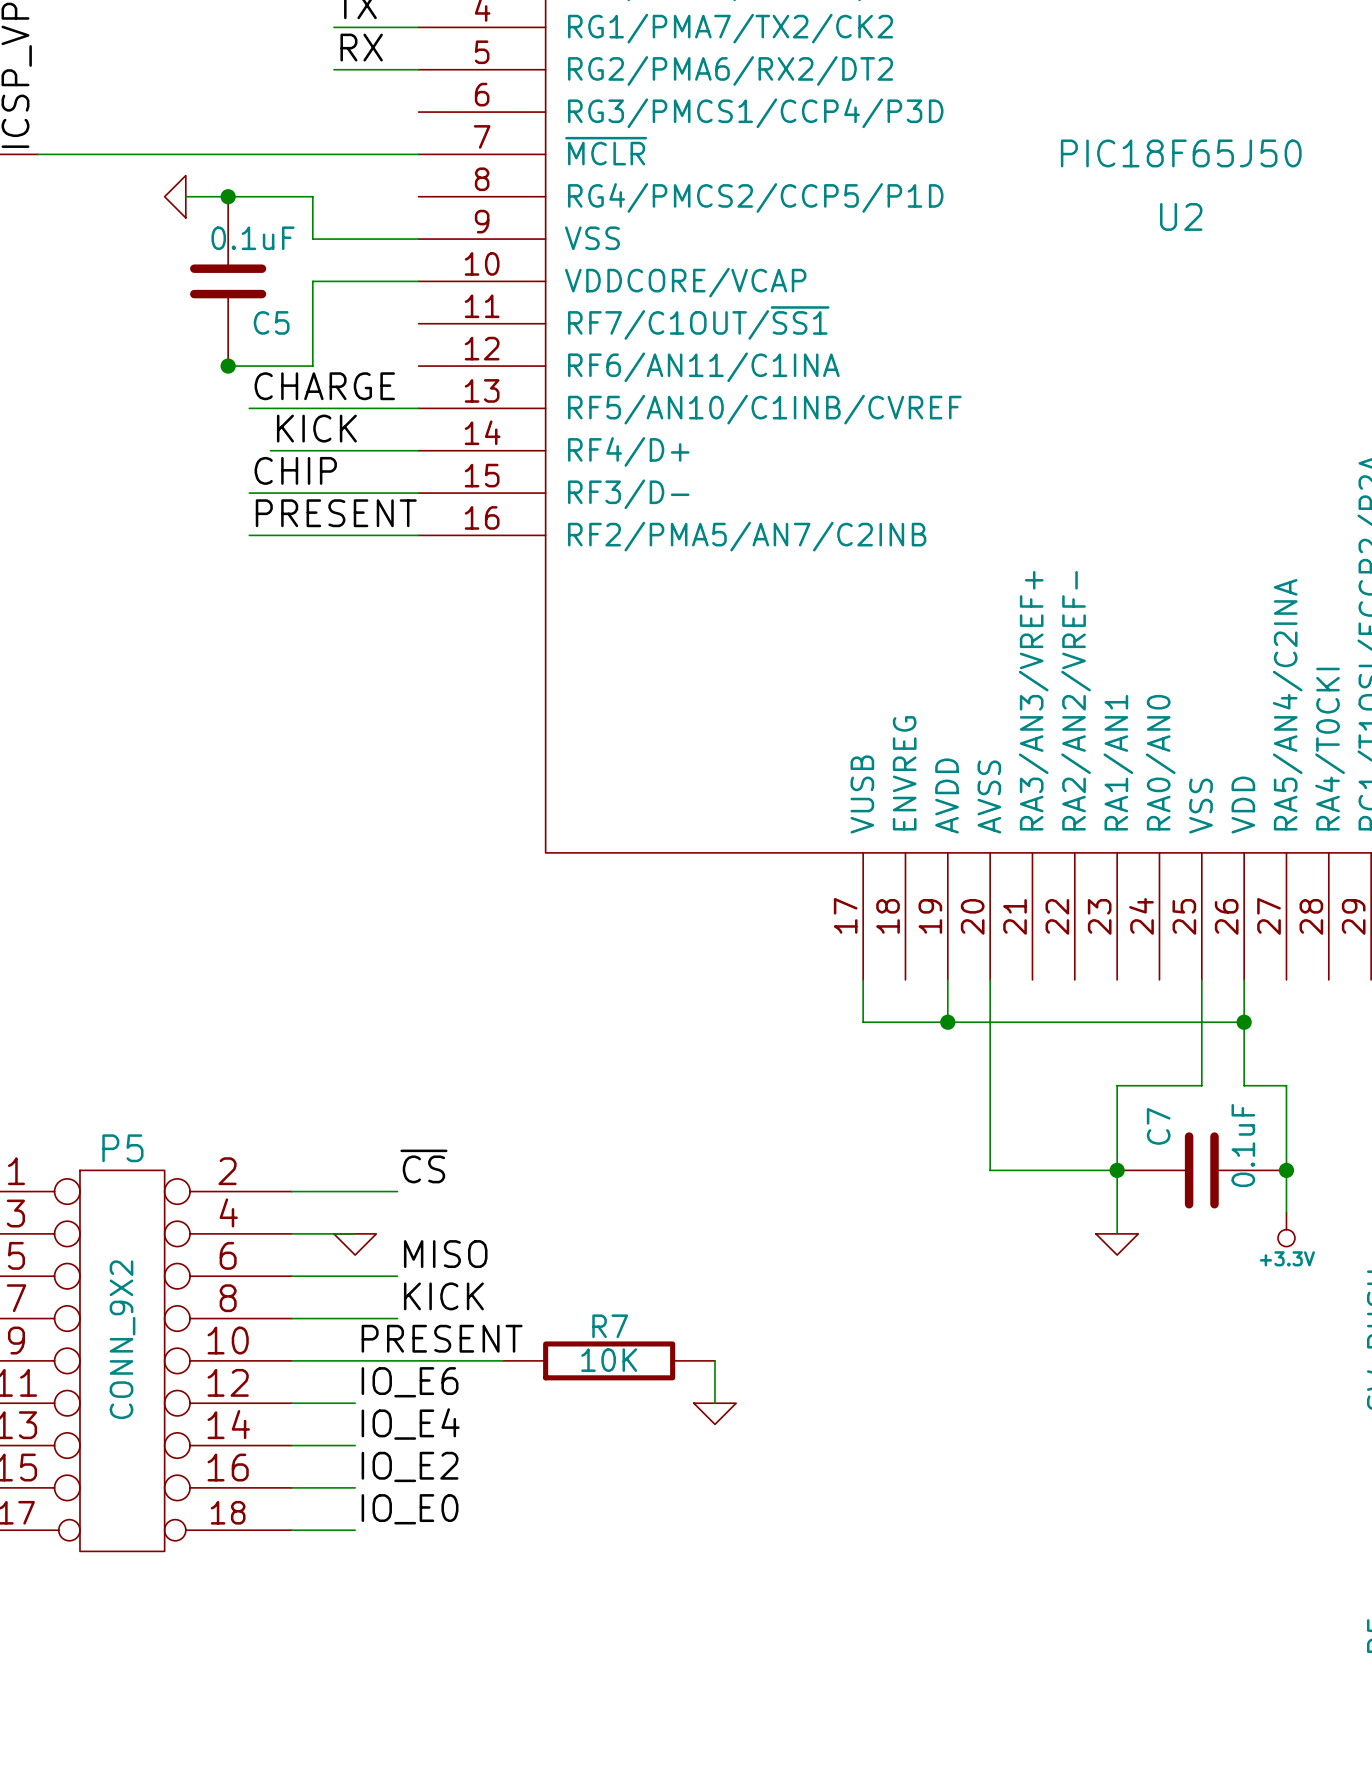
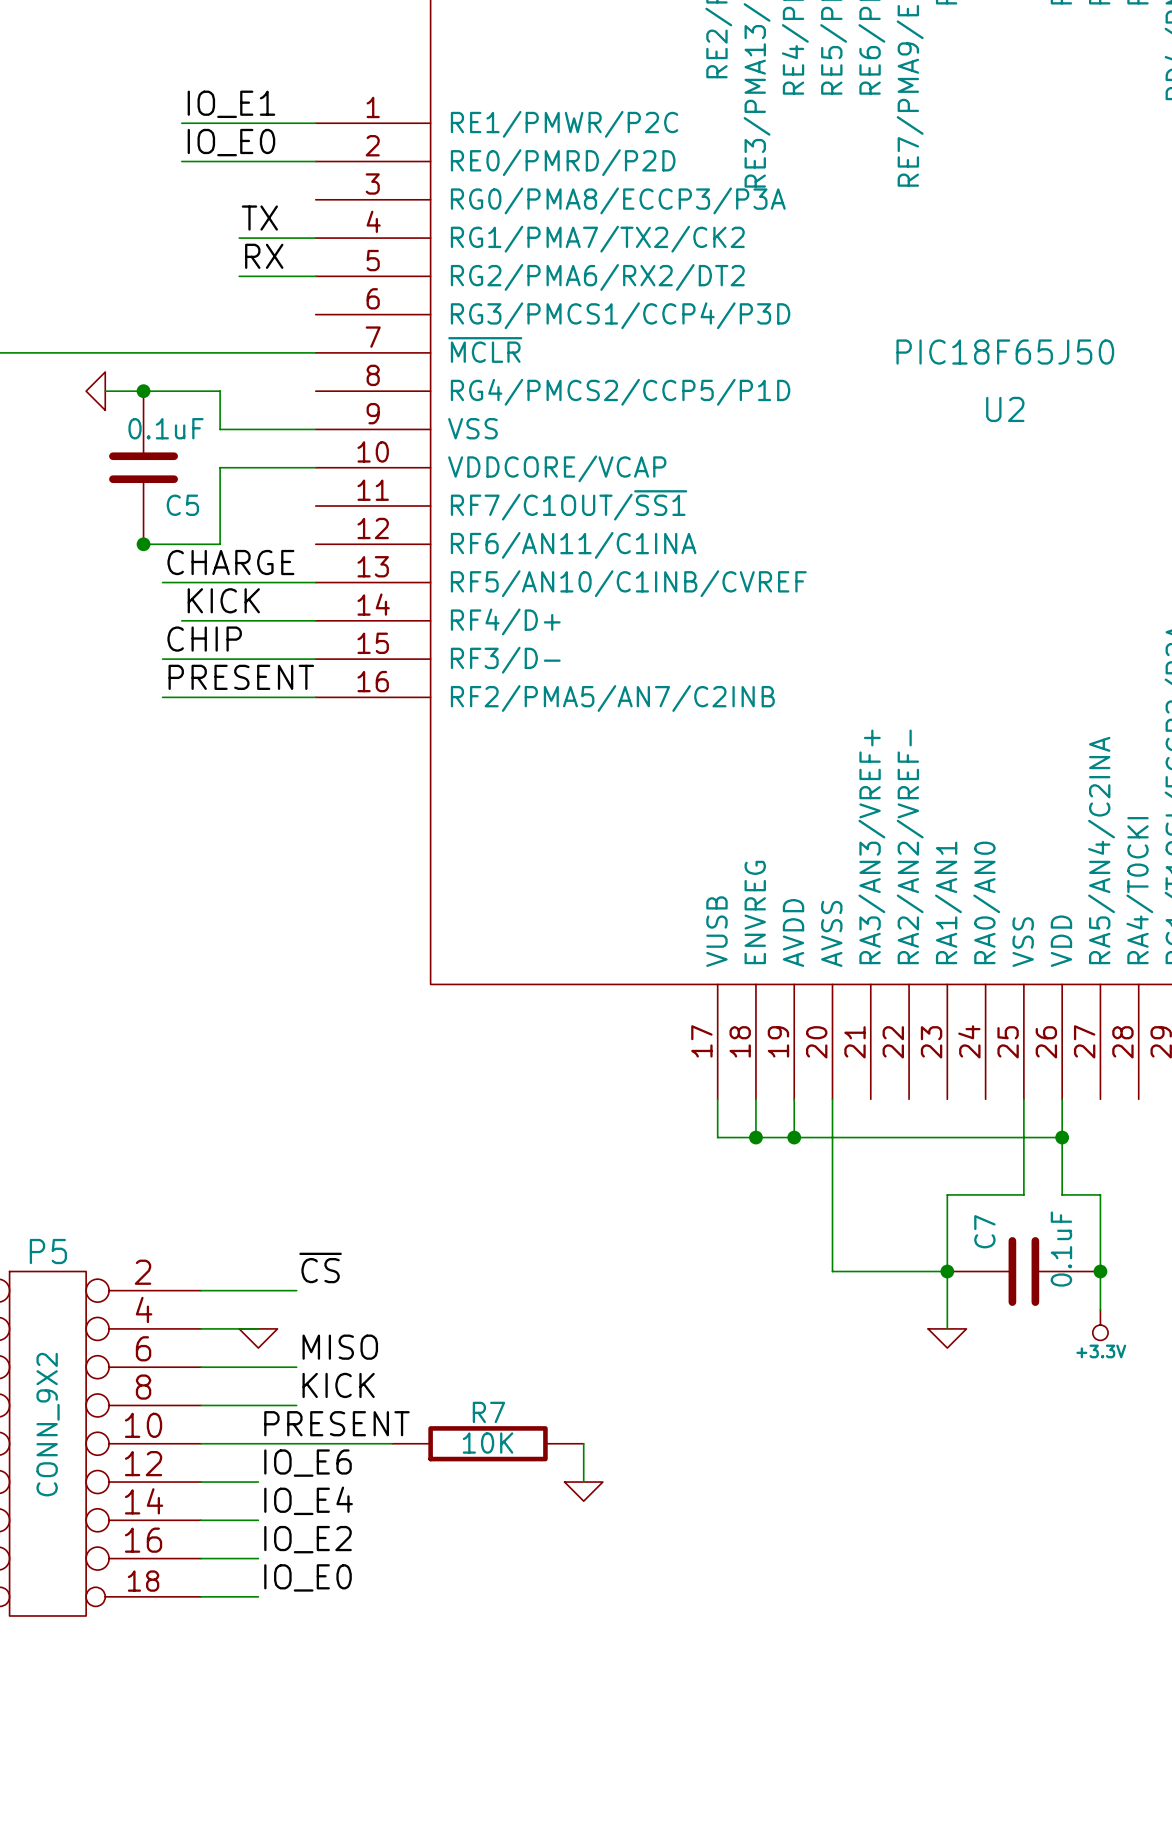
wire: none -> (755, 1099) (755, 1137)
junction: none -> (755, 1137)

